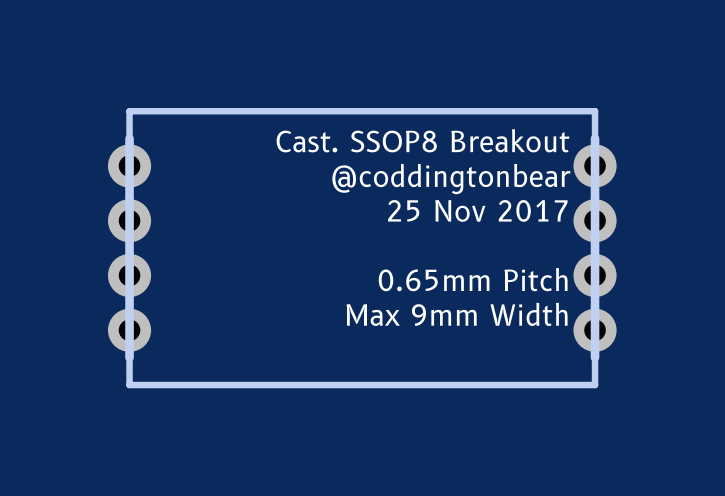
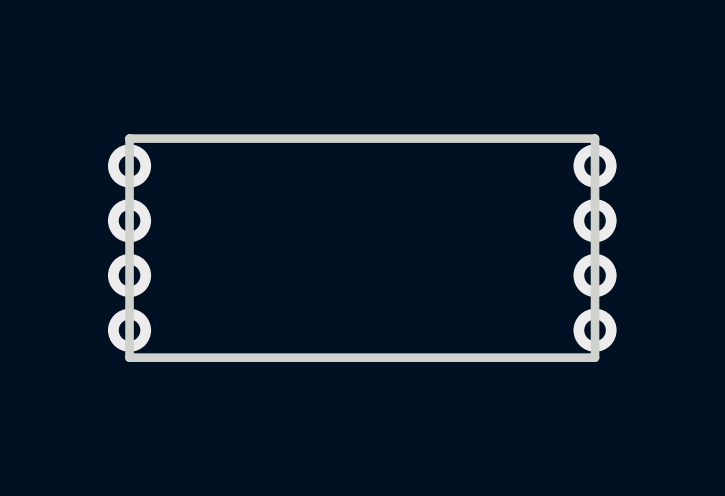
board edge: (595, 138) (595, 111) (129, 111) (129, 385) (595, 385) (595, 357) -> (595, 138) (129, 138)
text: Cast. SSOP8 Breakout (422, 140) -> none
text: @coddingtonbear (451, 179) -> none
text: 25 Nov 2017 (477, 210) -> none
text: 0.65mm Pitch (473, 279) -> none
text: Max 9mm Width (457, 314) -> none
board edge: none -> (595, 357) (129, 357)

